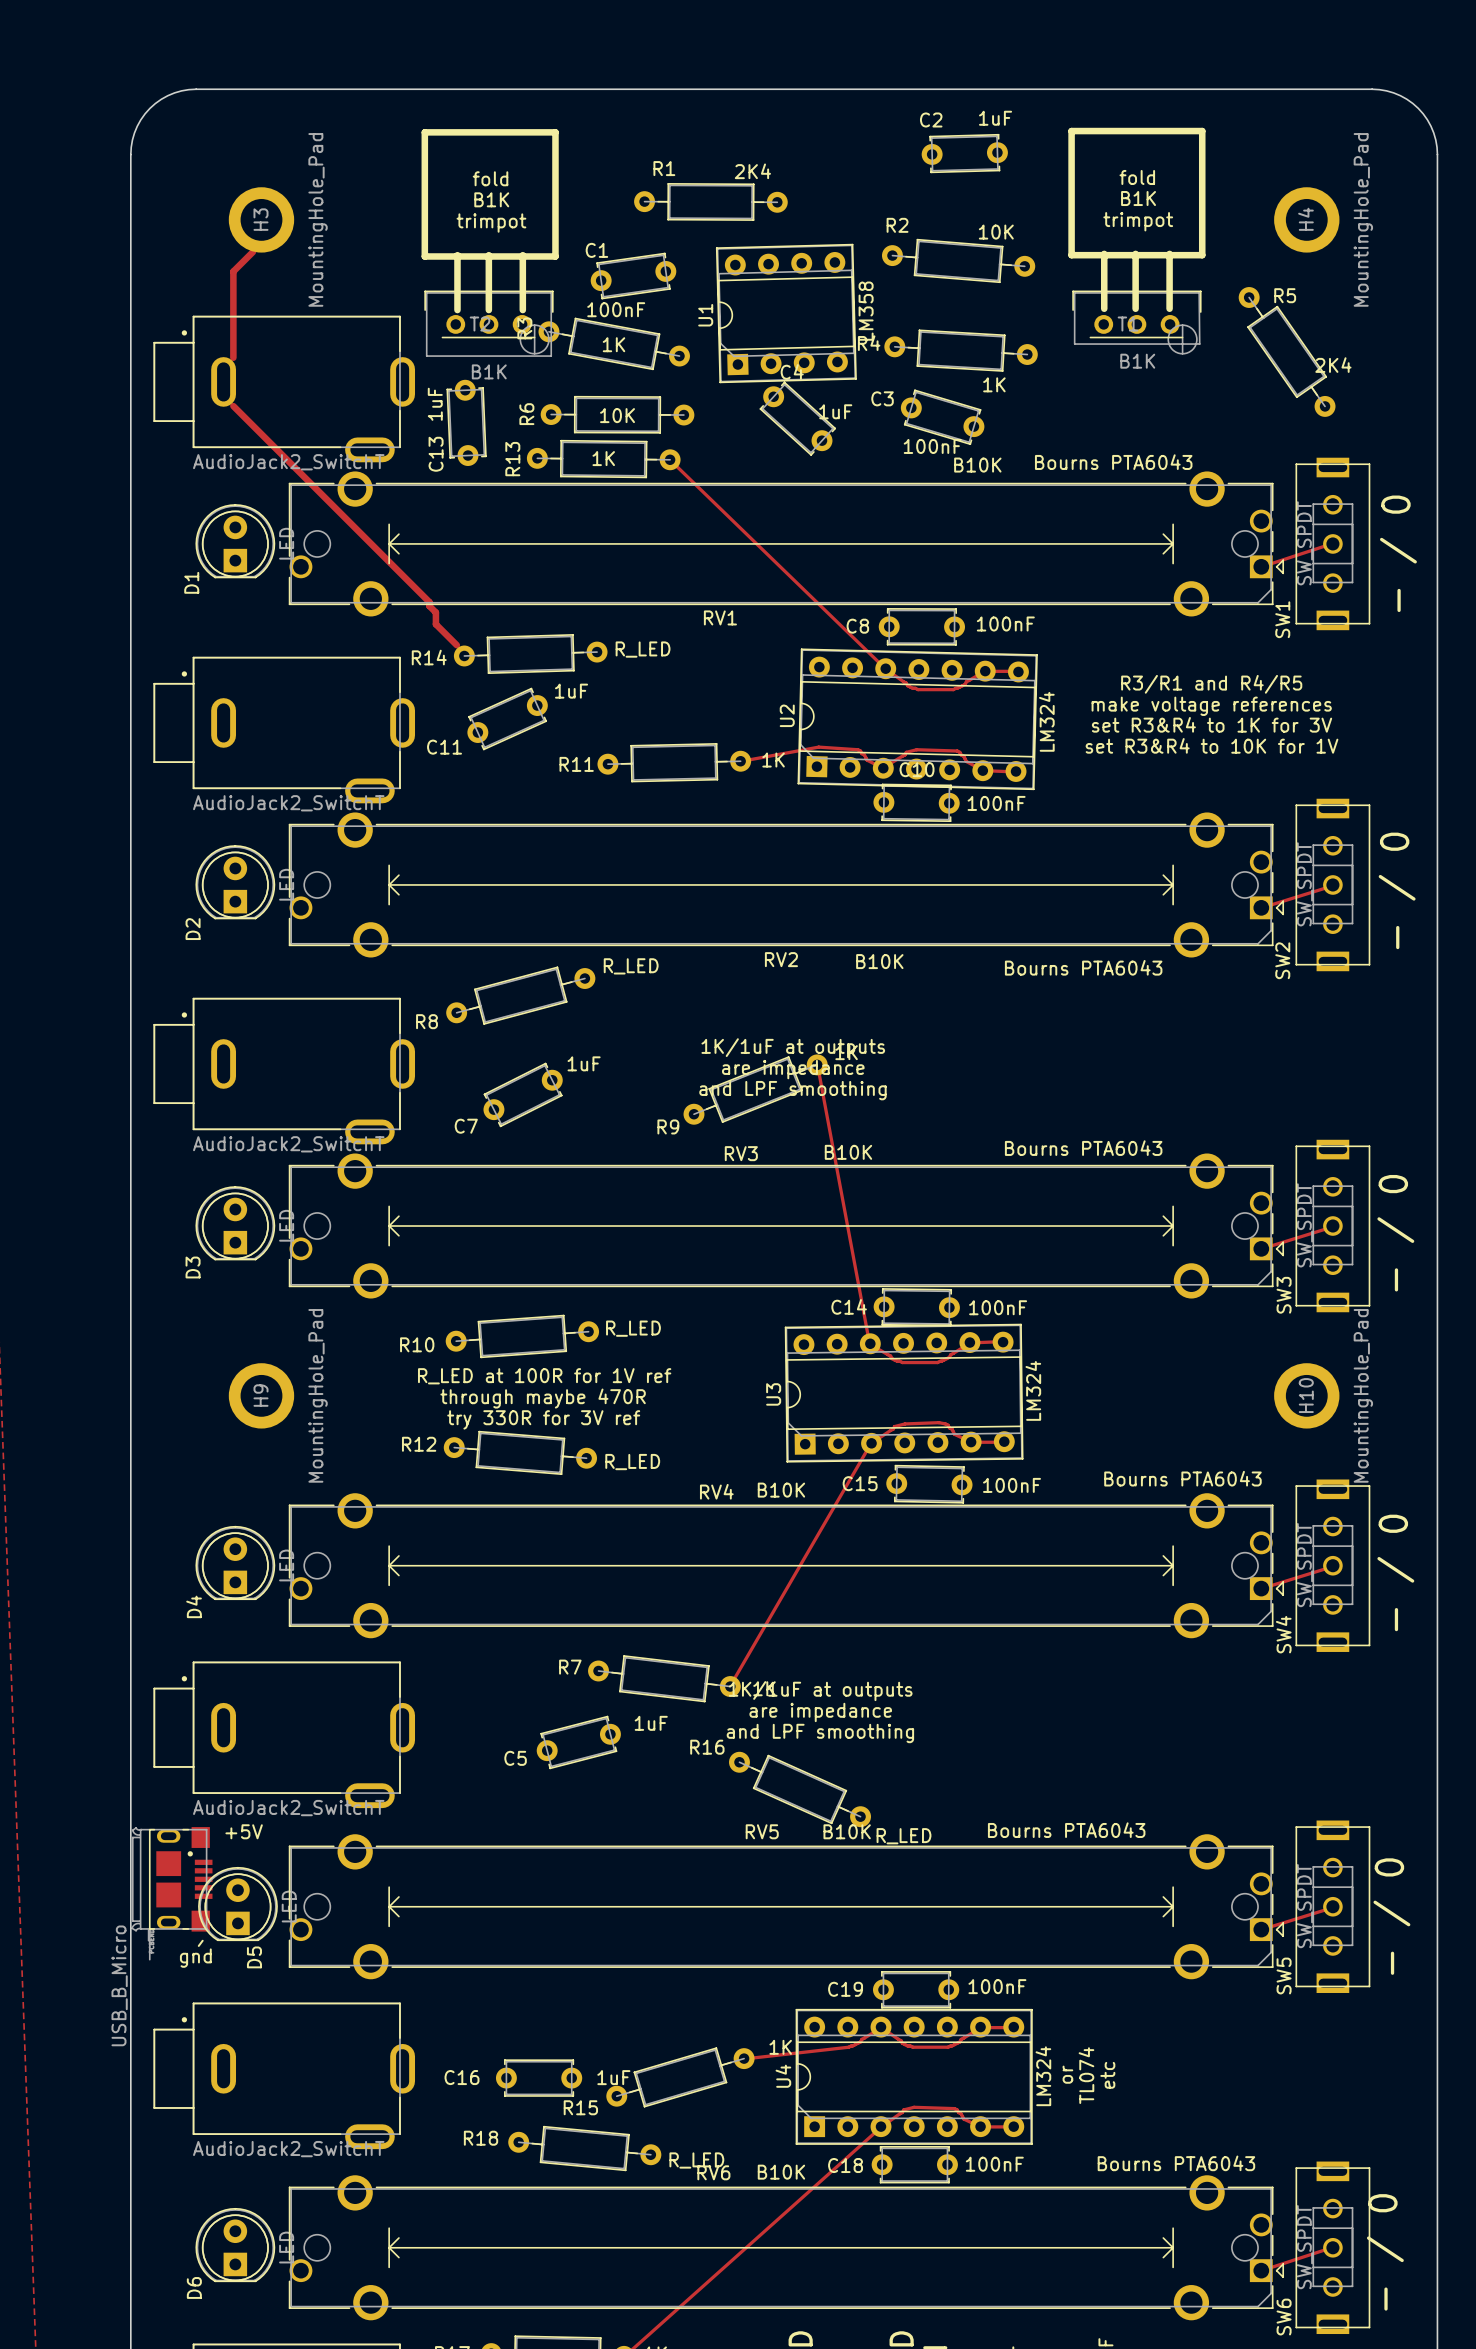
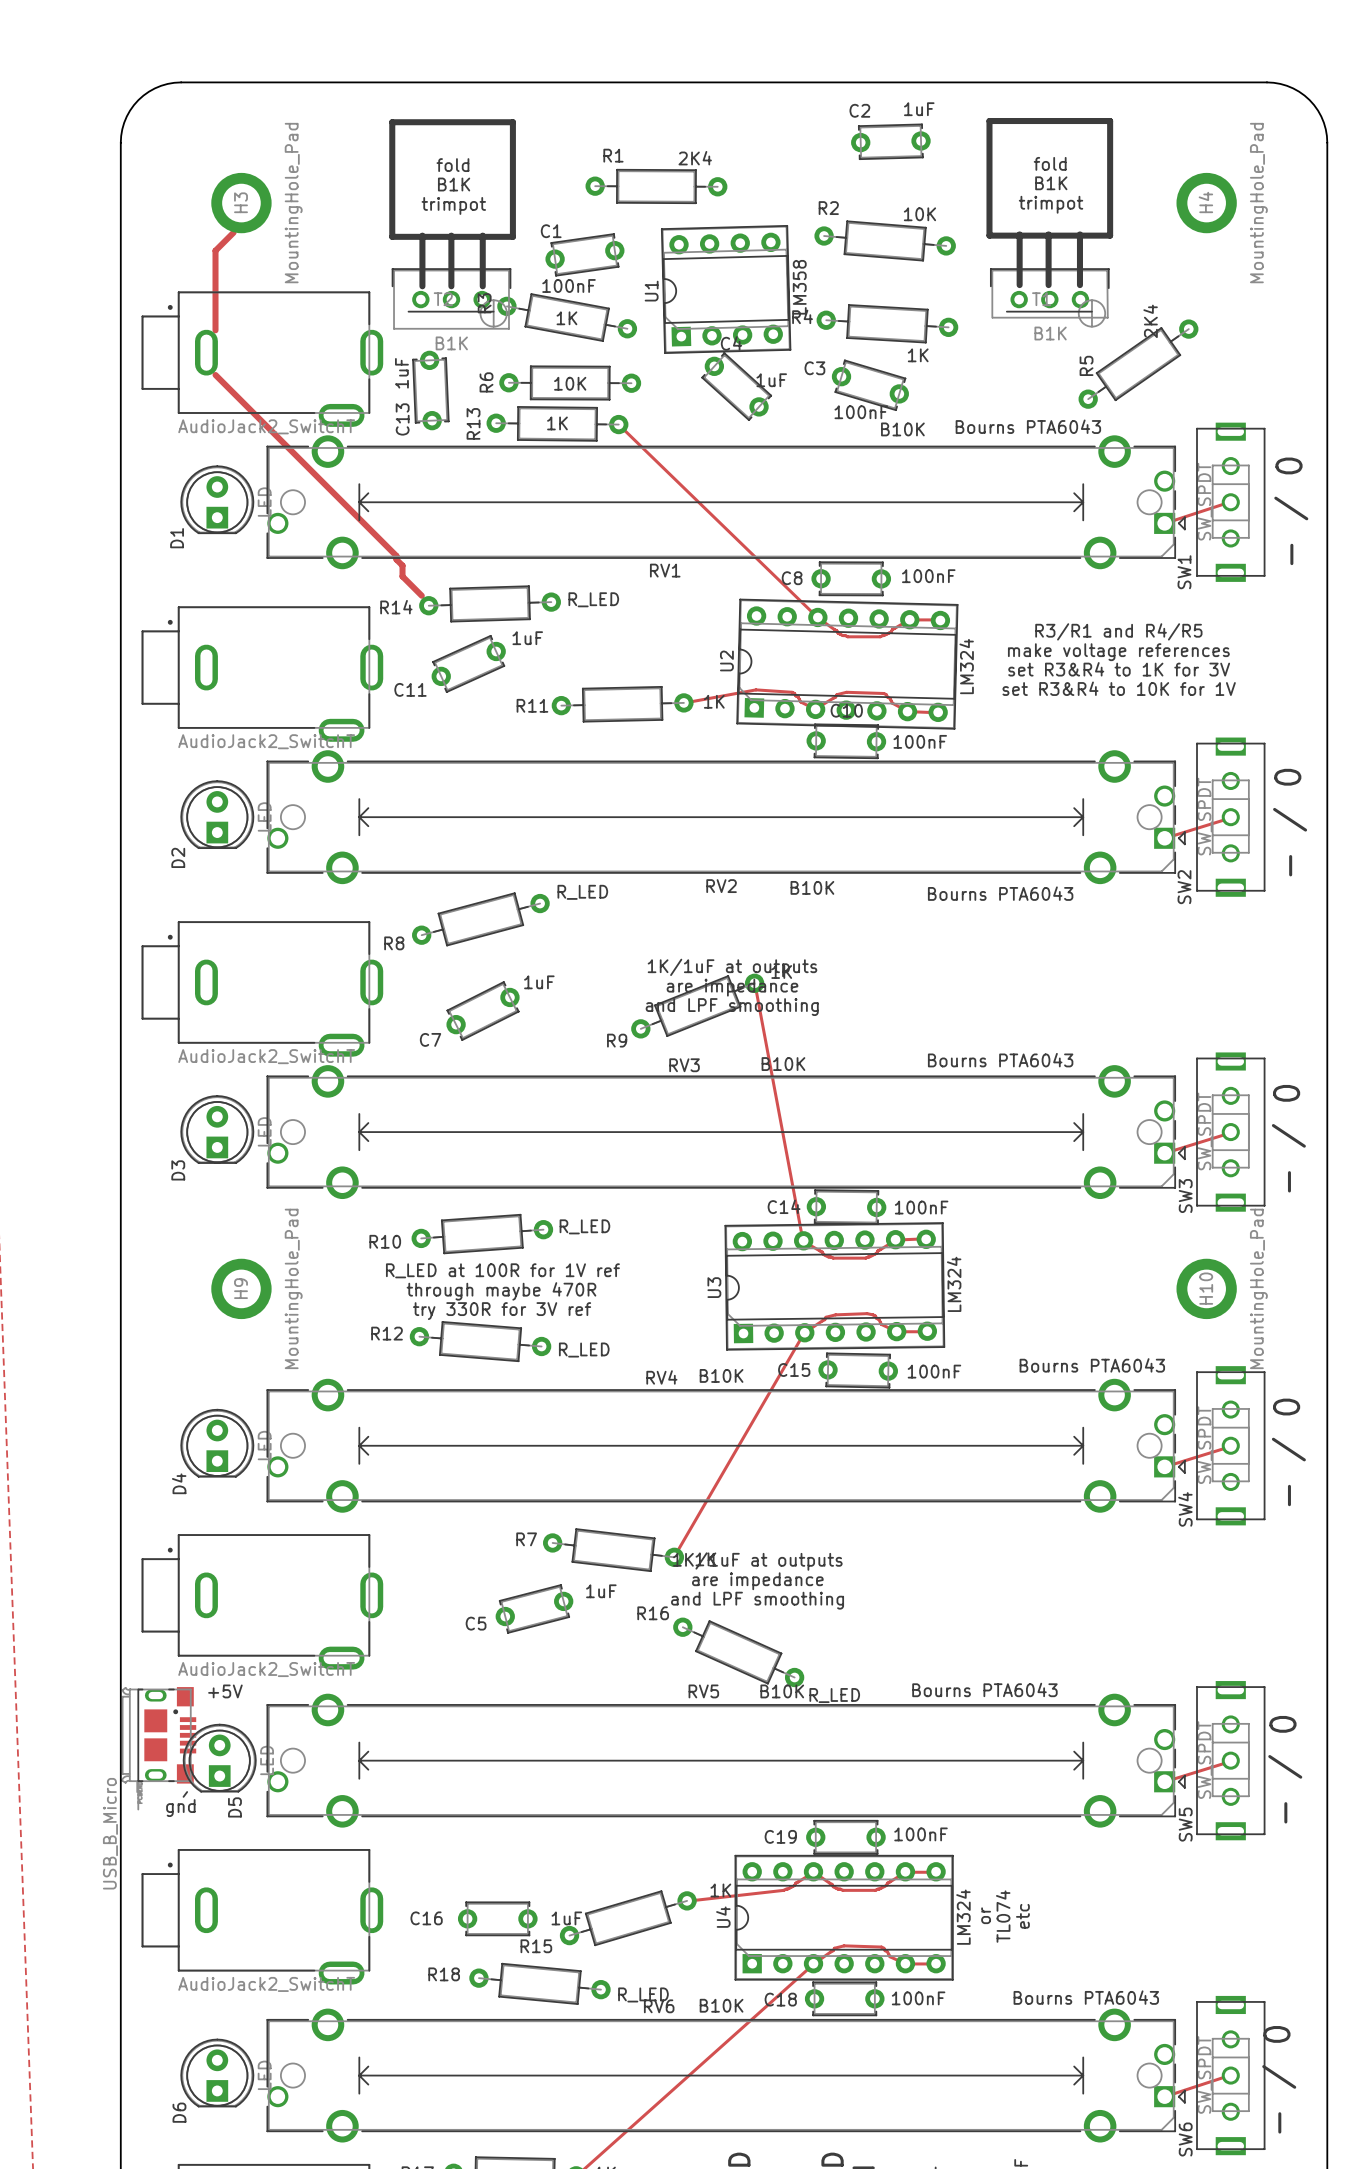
R5 name position: R5 (1285, 295) -> R5 (1086, 365)
R5 rotation: 0° (1287, 351) -> 90° clockwise (1138, 364)
R5 value position: 2K4 (1333, 365) -> 2K4 (1150, 321)

